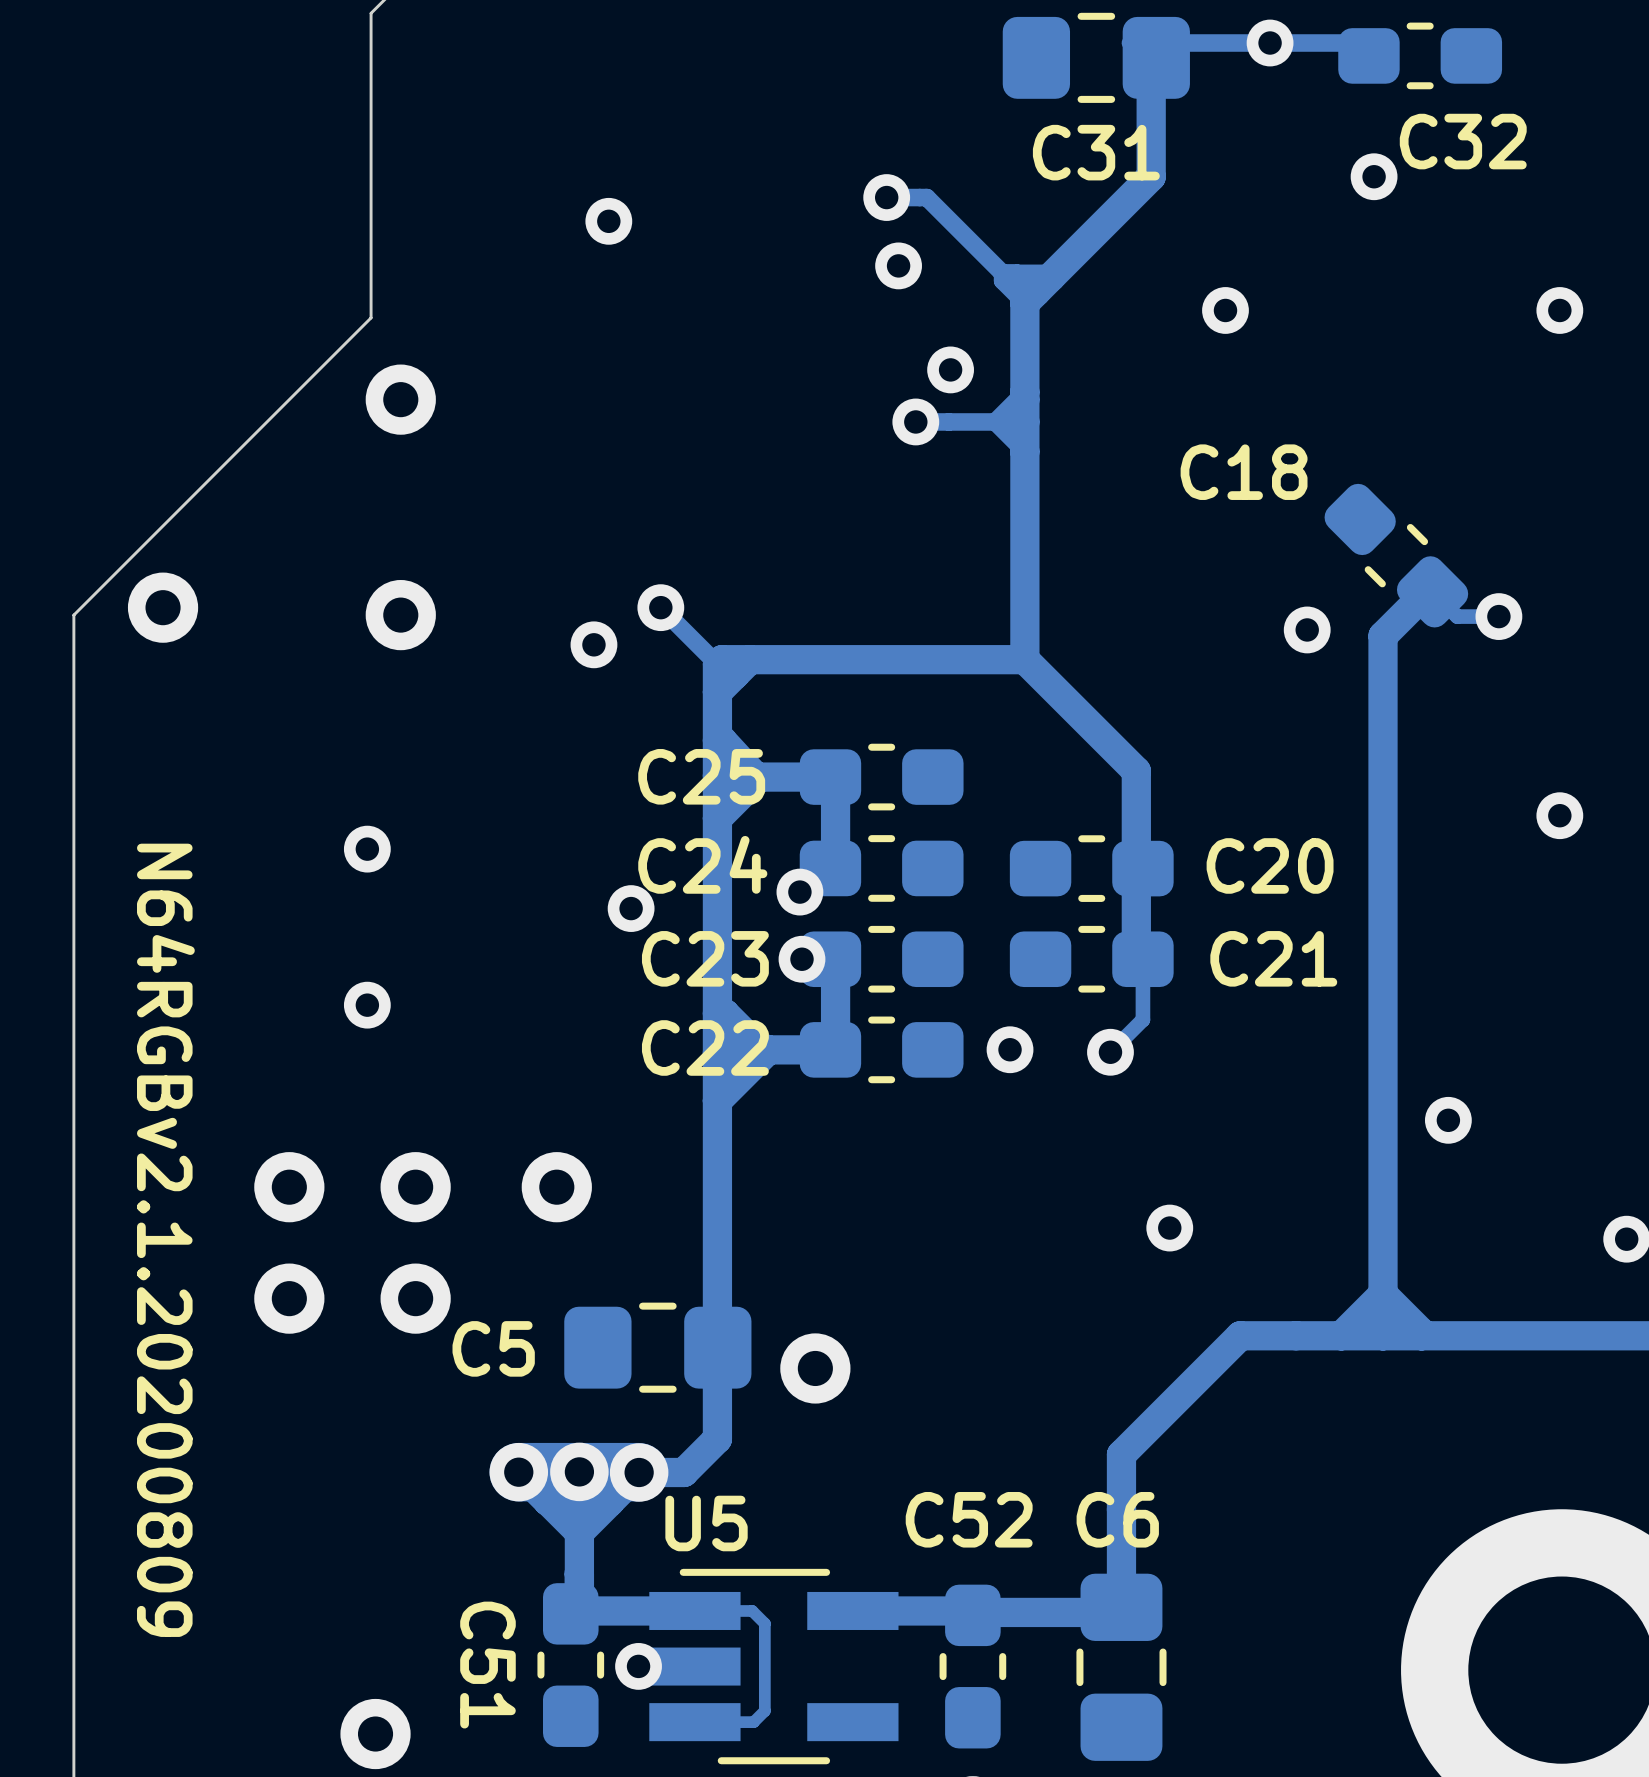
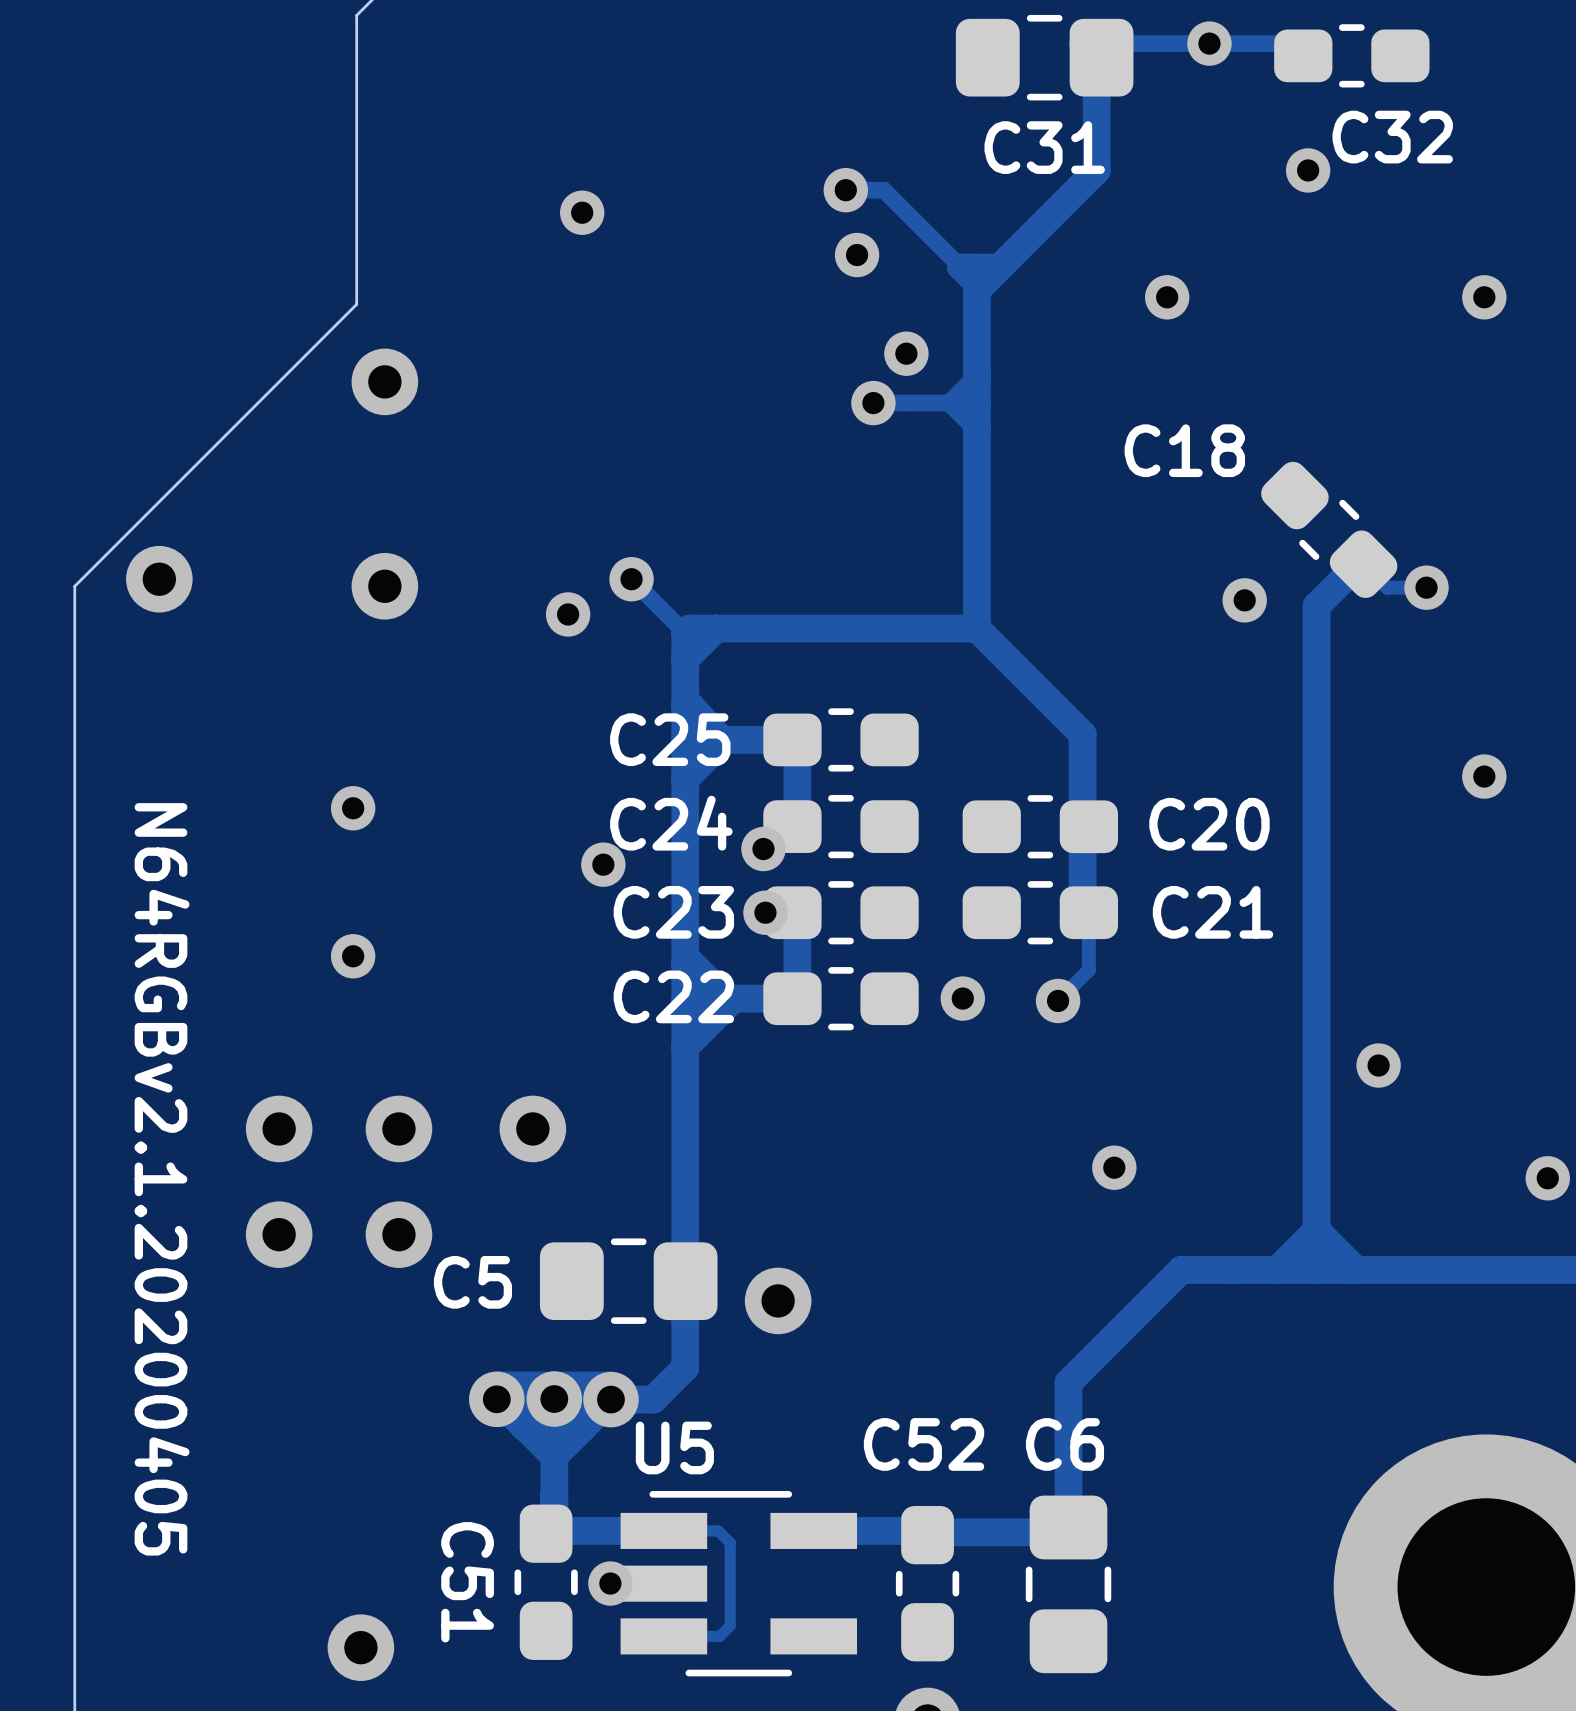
text: N64RGBv2.1.20200809 (165, 1240) -> N64RGBv2.1.20200405 (162, 1179)

